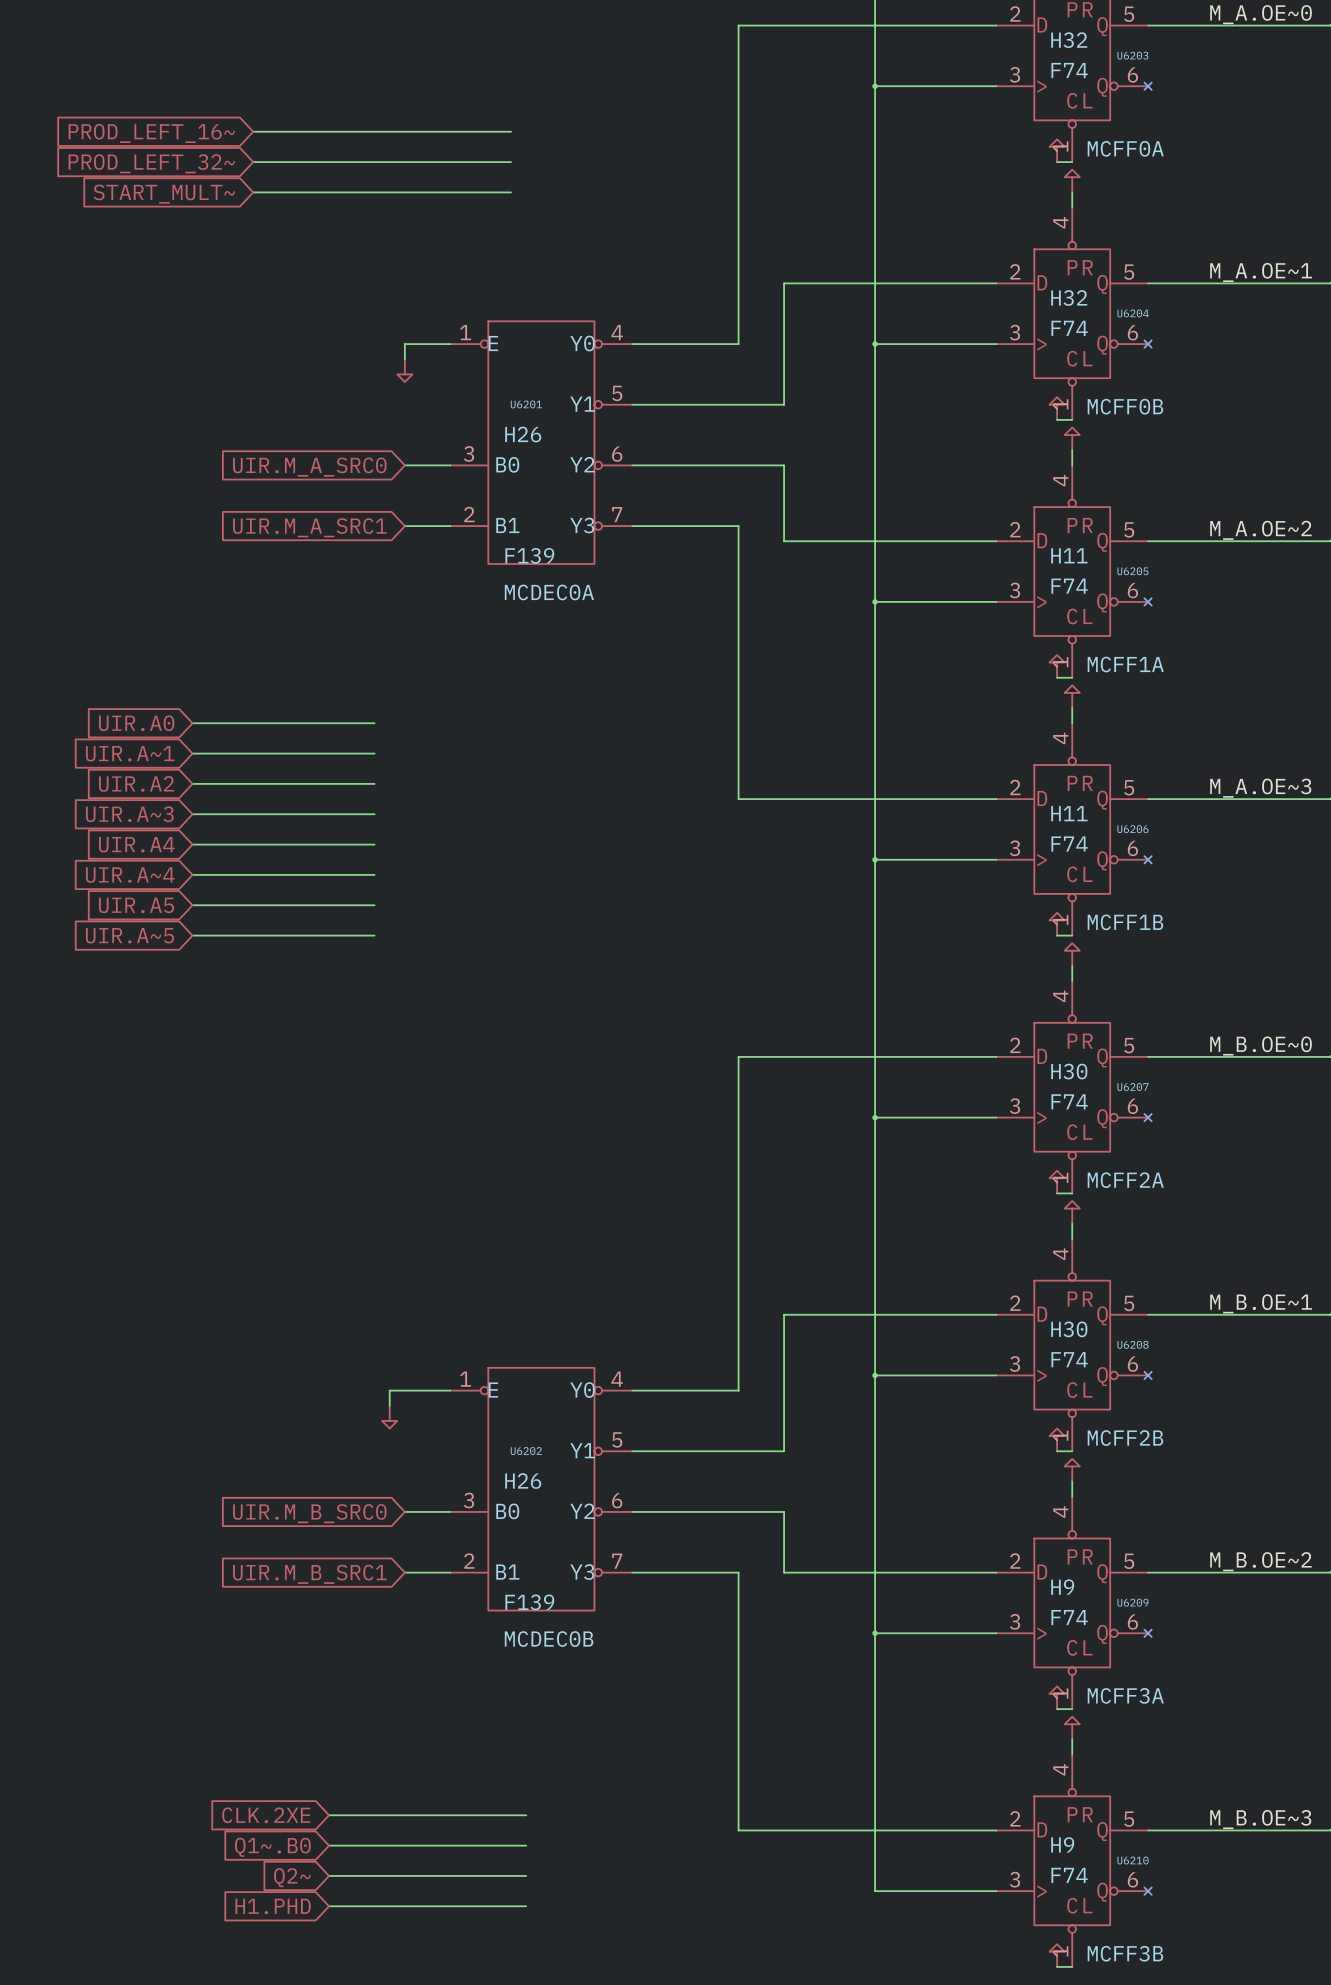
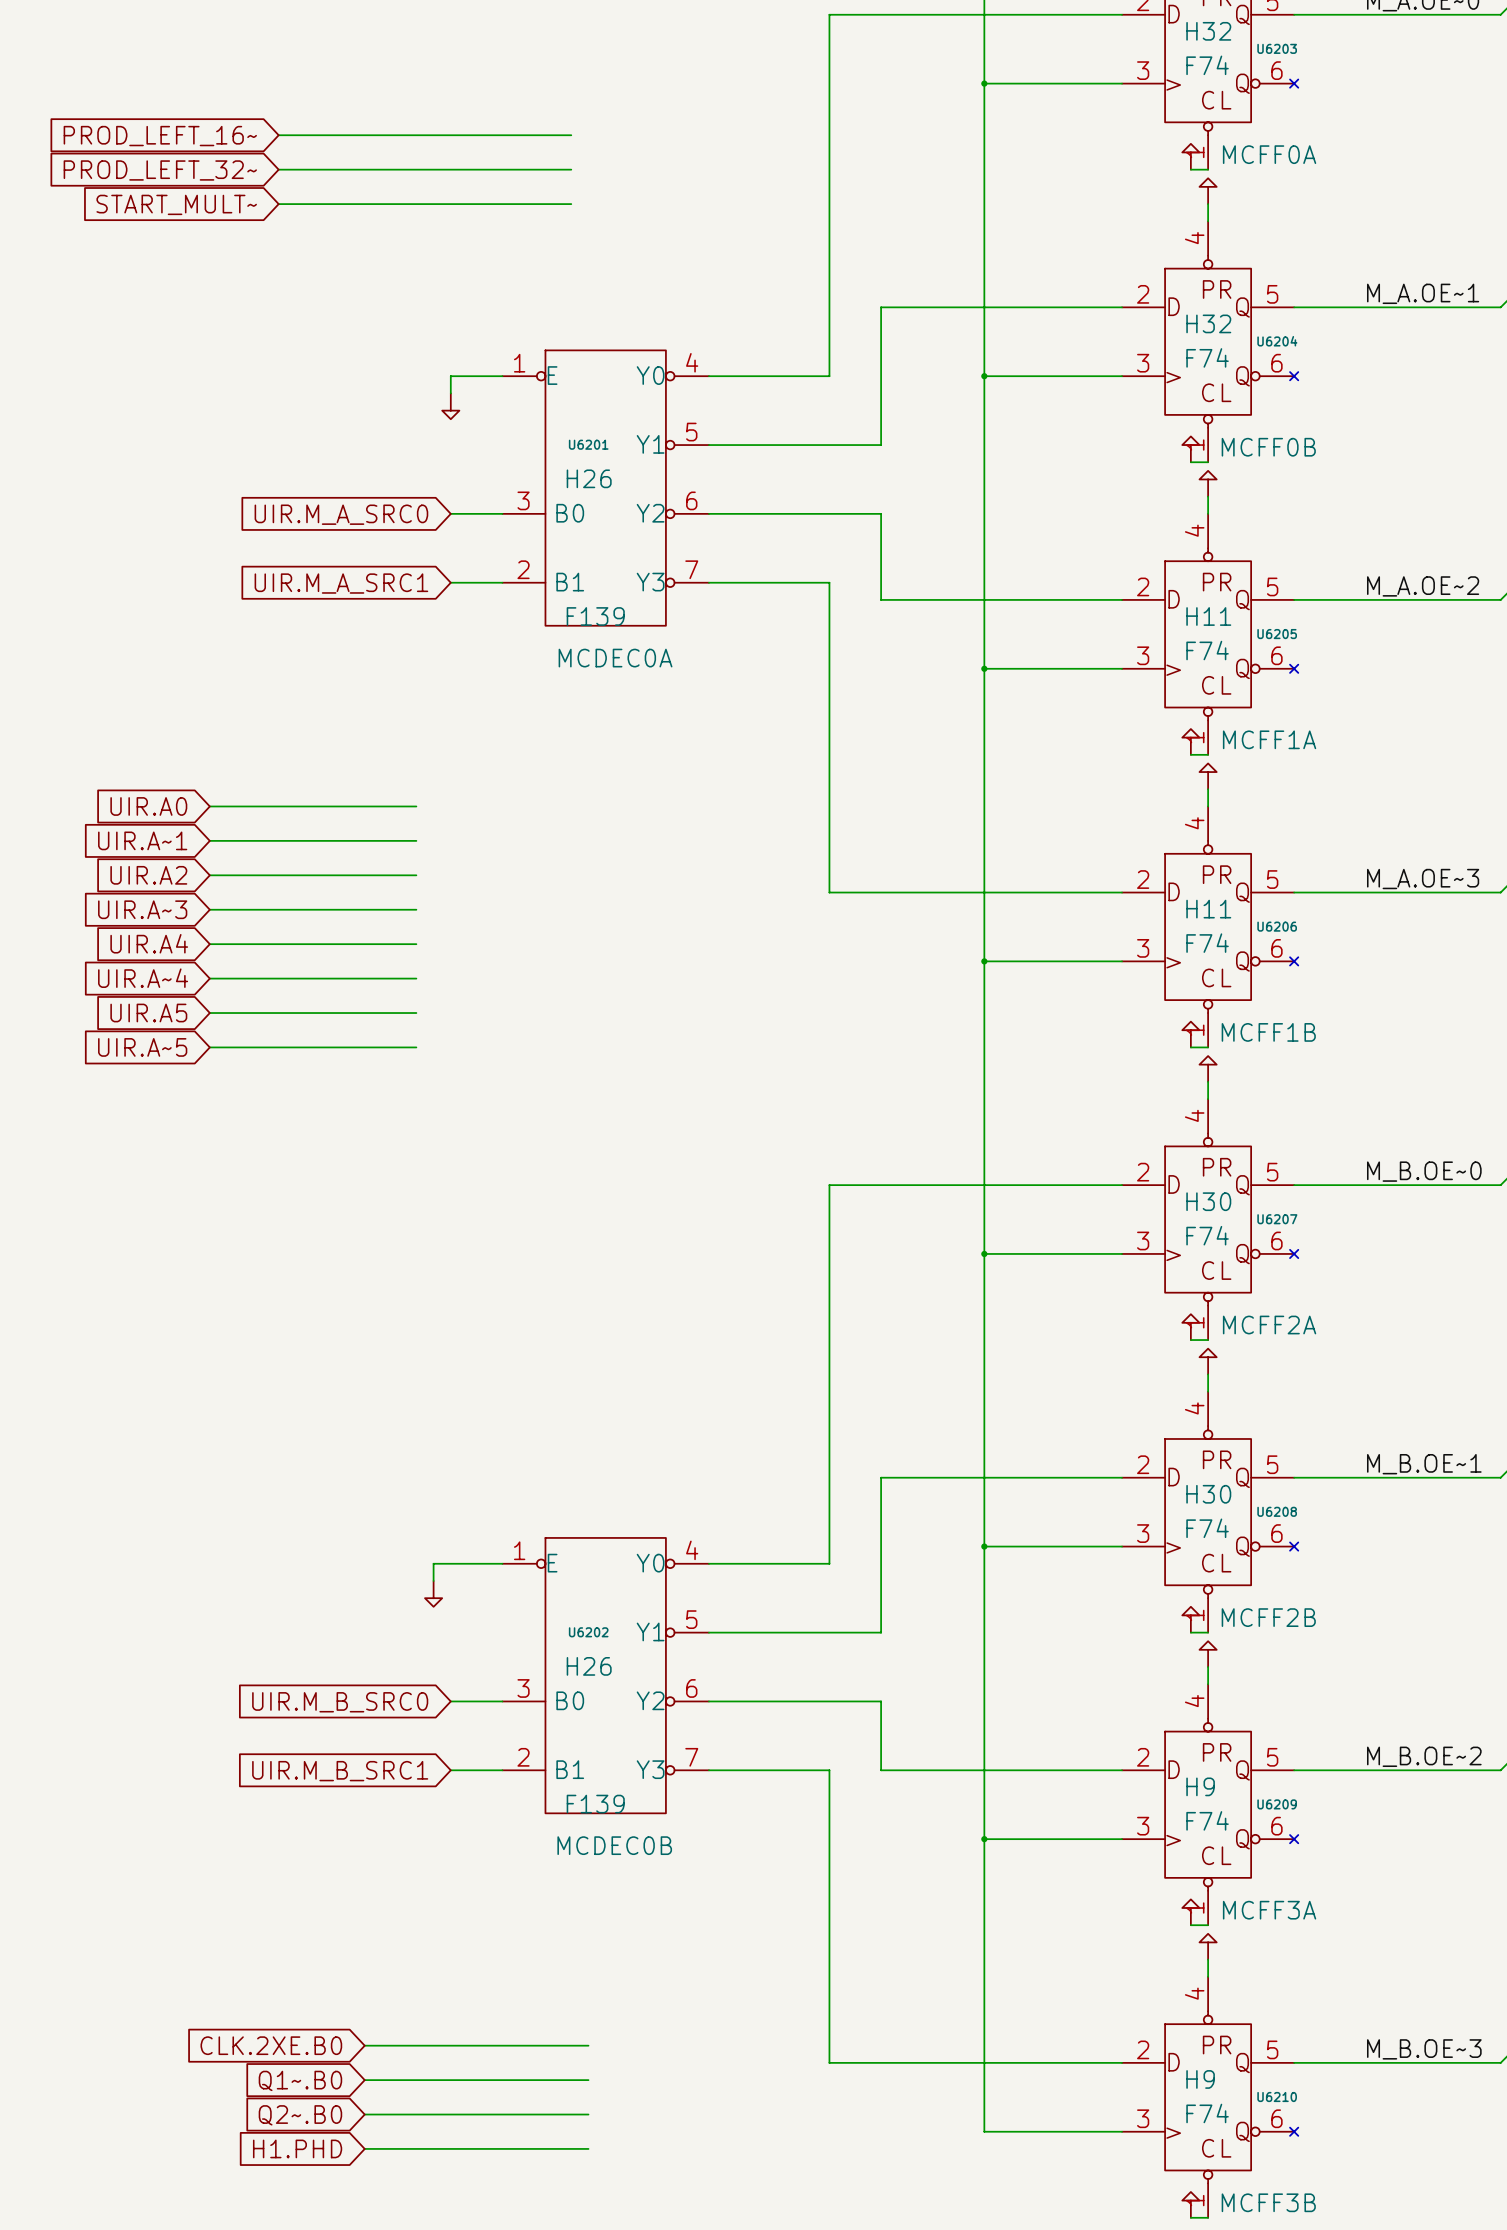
global label: CLK.2XE (266, 1815) -> CLK.2XE.B0 (271, 2045)
global label: Q2~ (292, 1877) -> Q2~.B0 (300, 2115)

